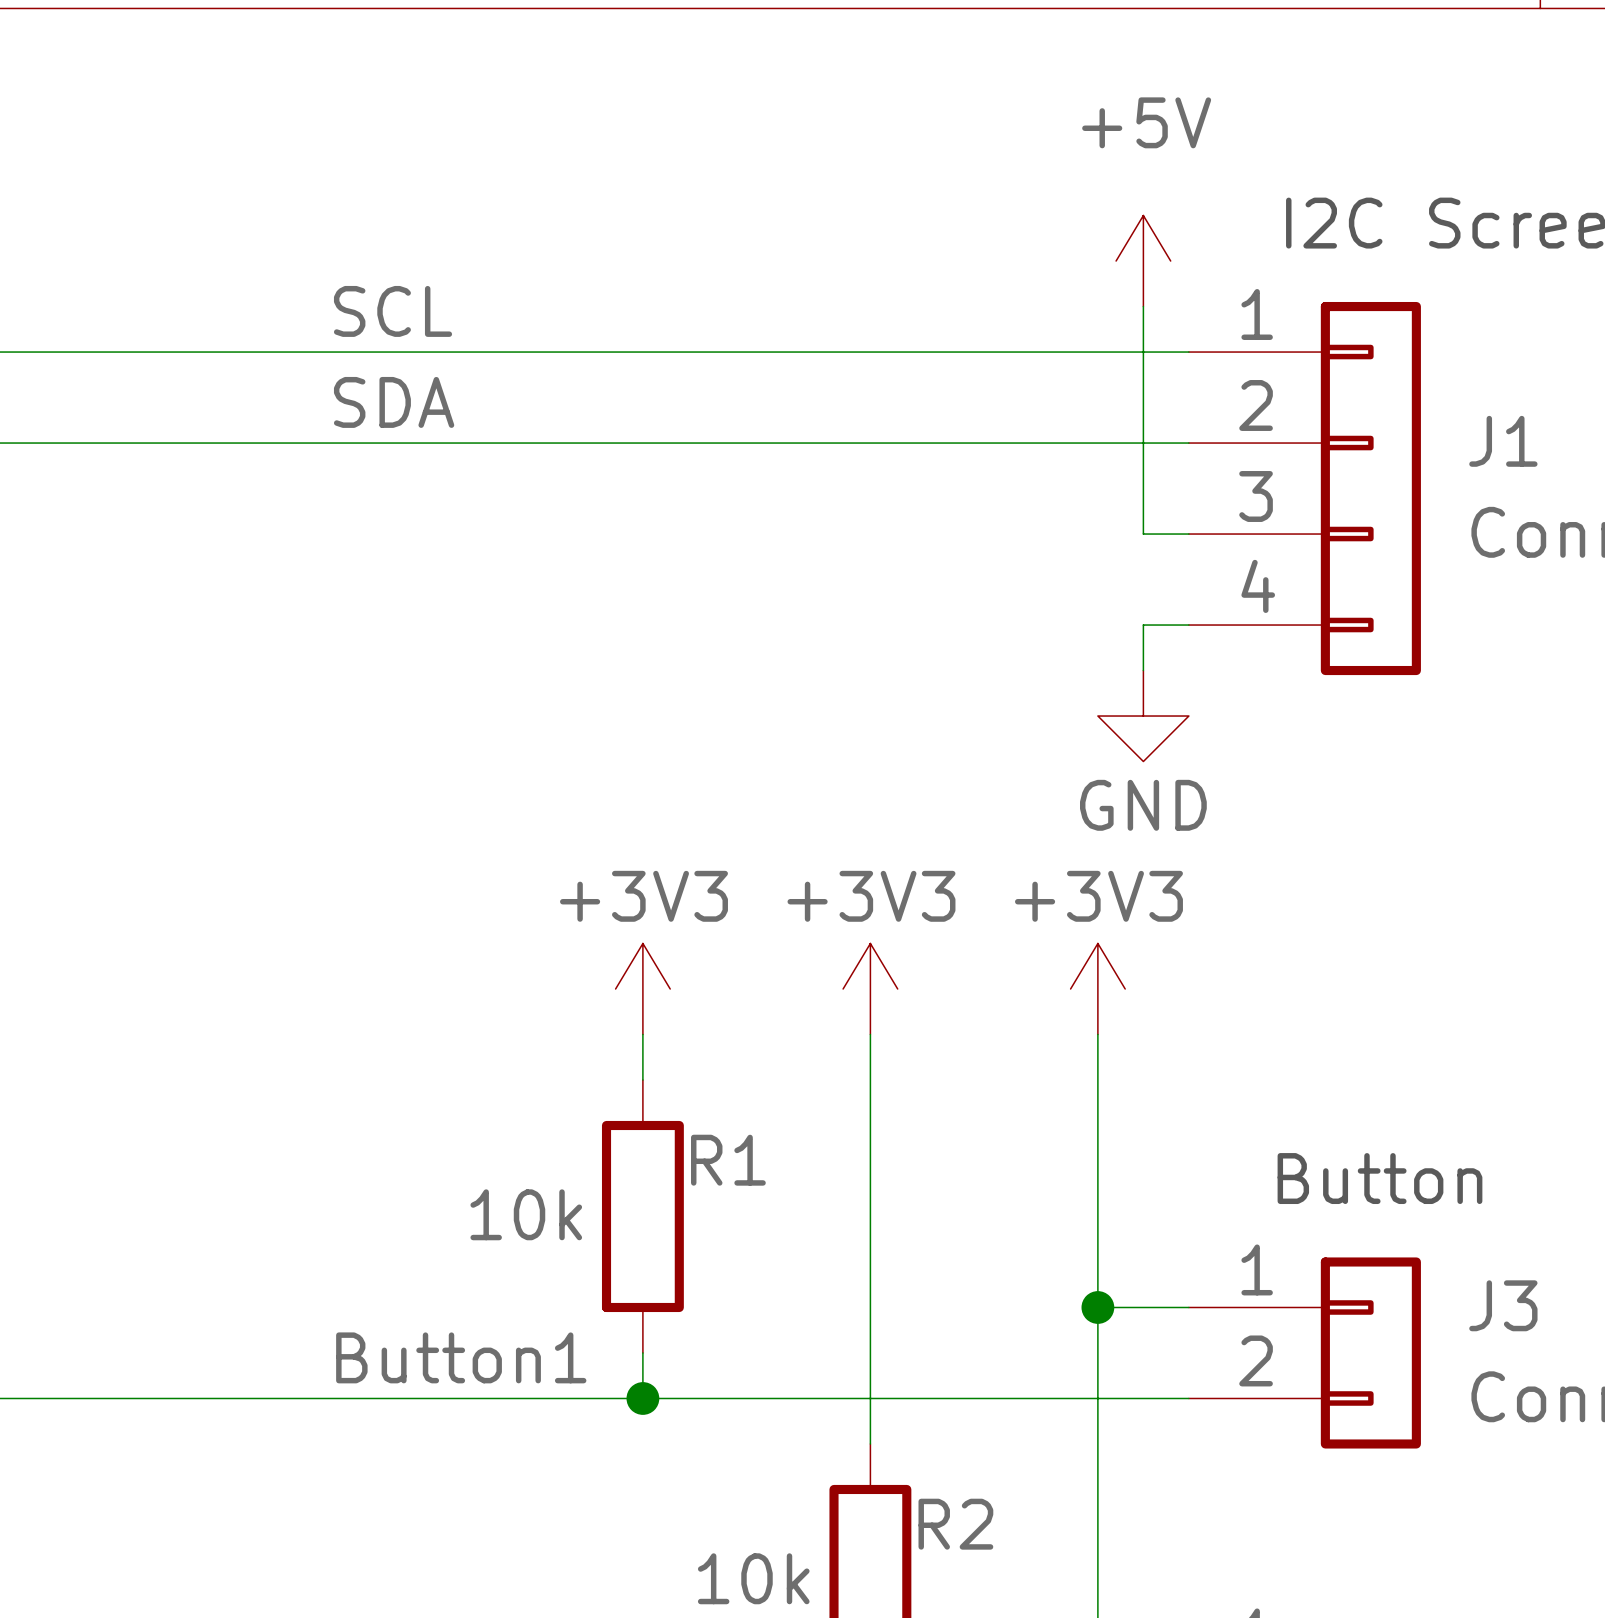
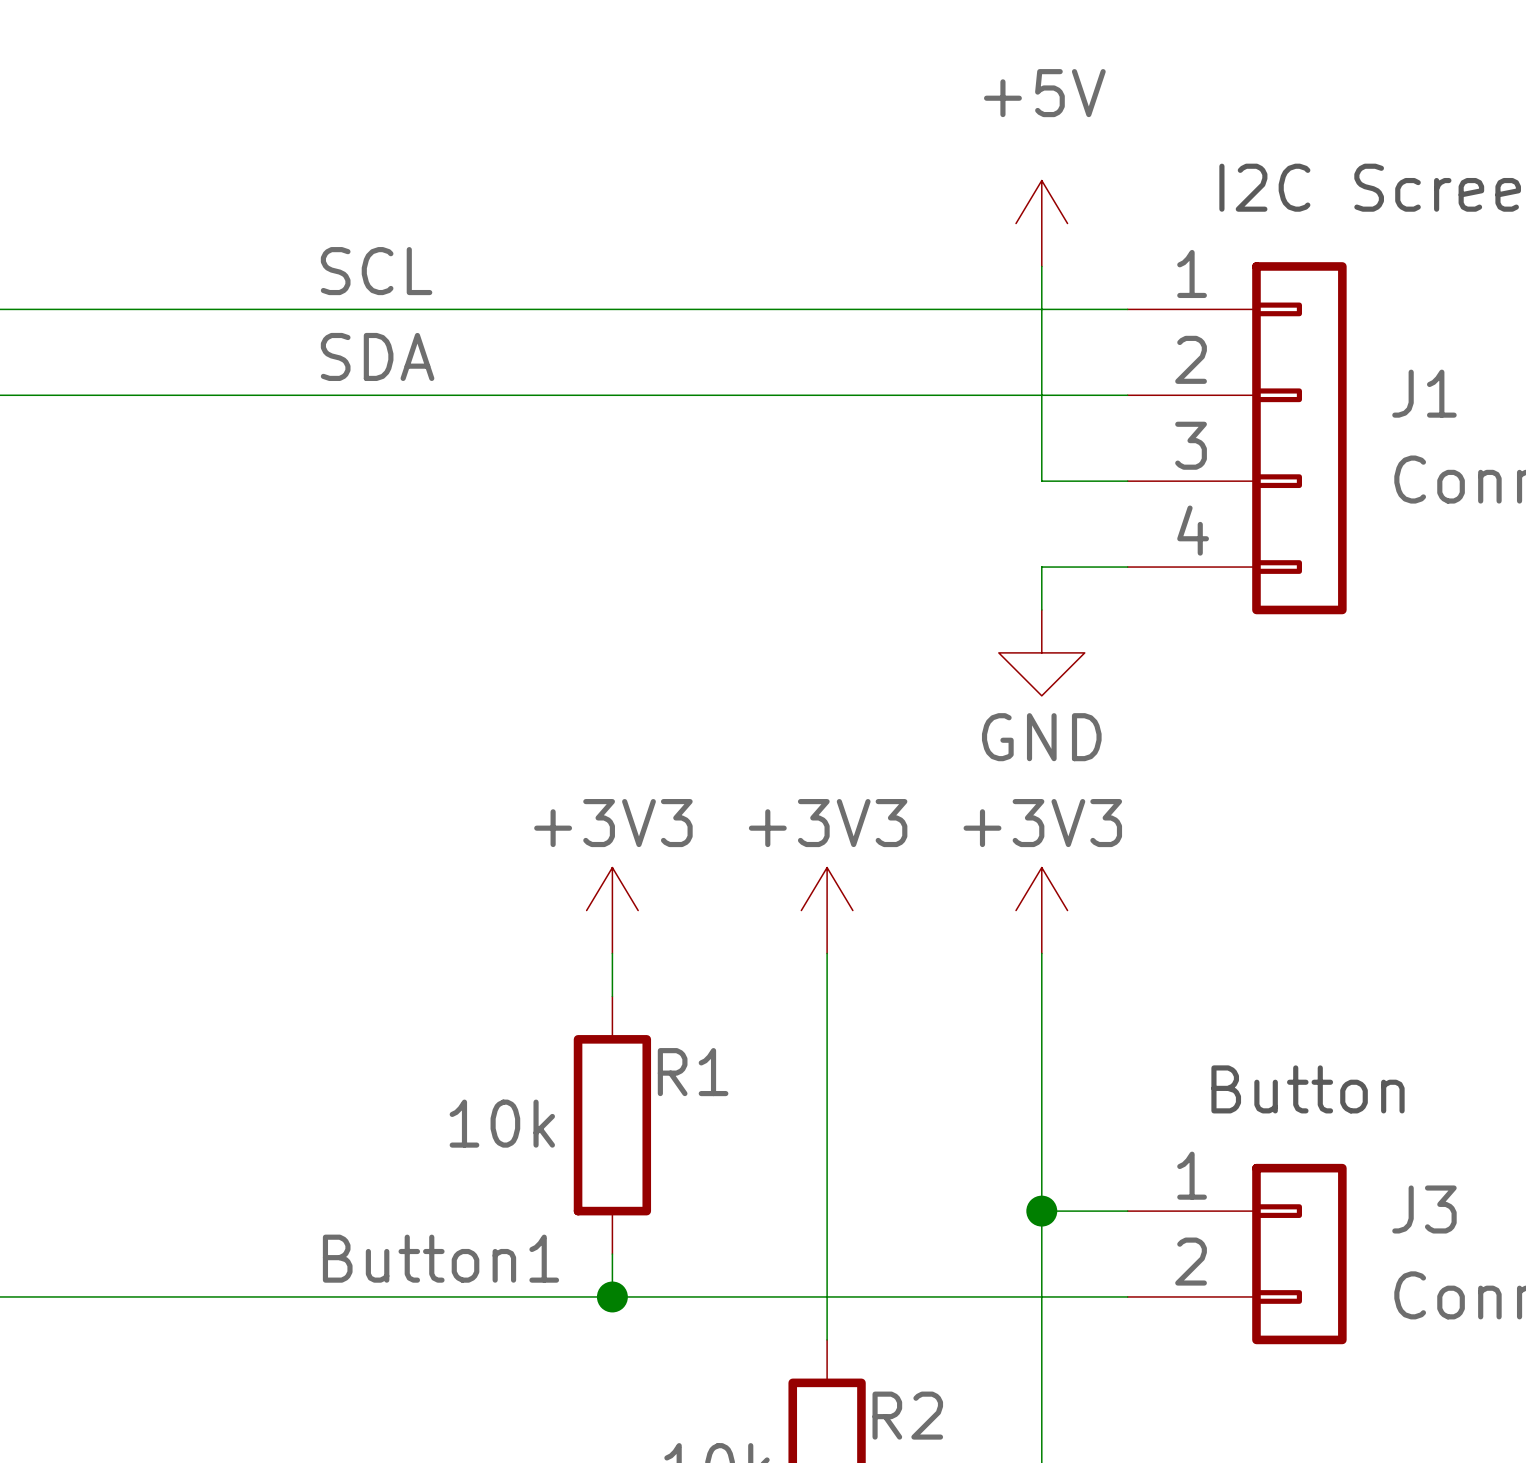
power symbol position: +5V (1143, 261) -> +5V (1041, 223)
wire: (1143, 306) (1143, 534) -> (1041, 266) (1041, 481) (1084, 481)
wire: (1143, 625) (1143, 670) -> (1084, 567) (1041, 567) (1041, 609)
power symbol position: GND (1143, 716) -> GND (1041, 652)

